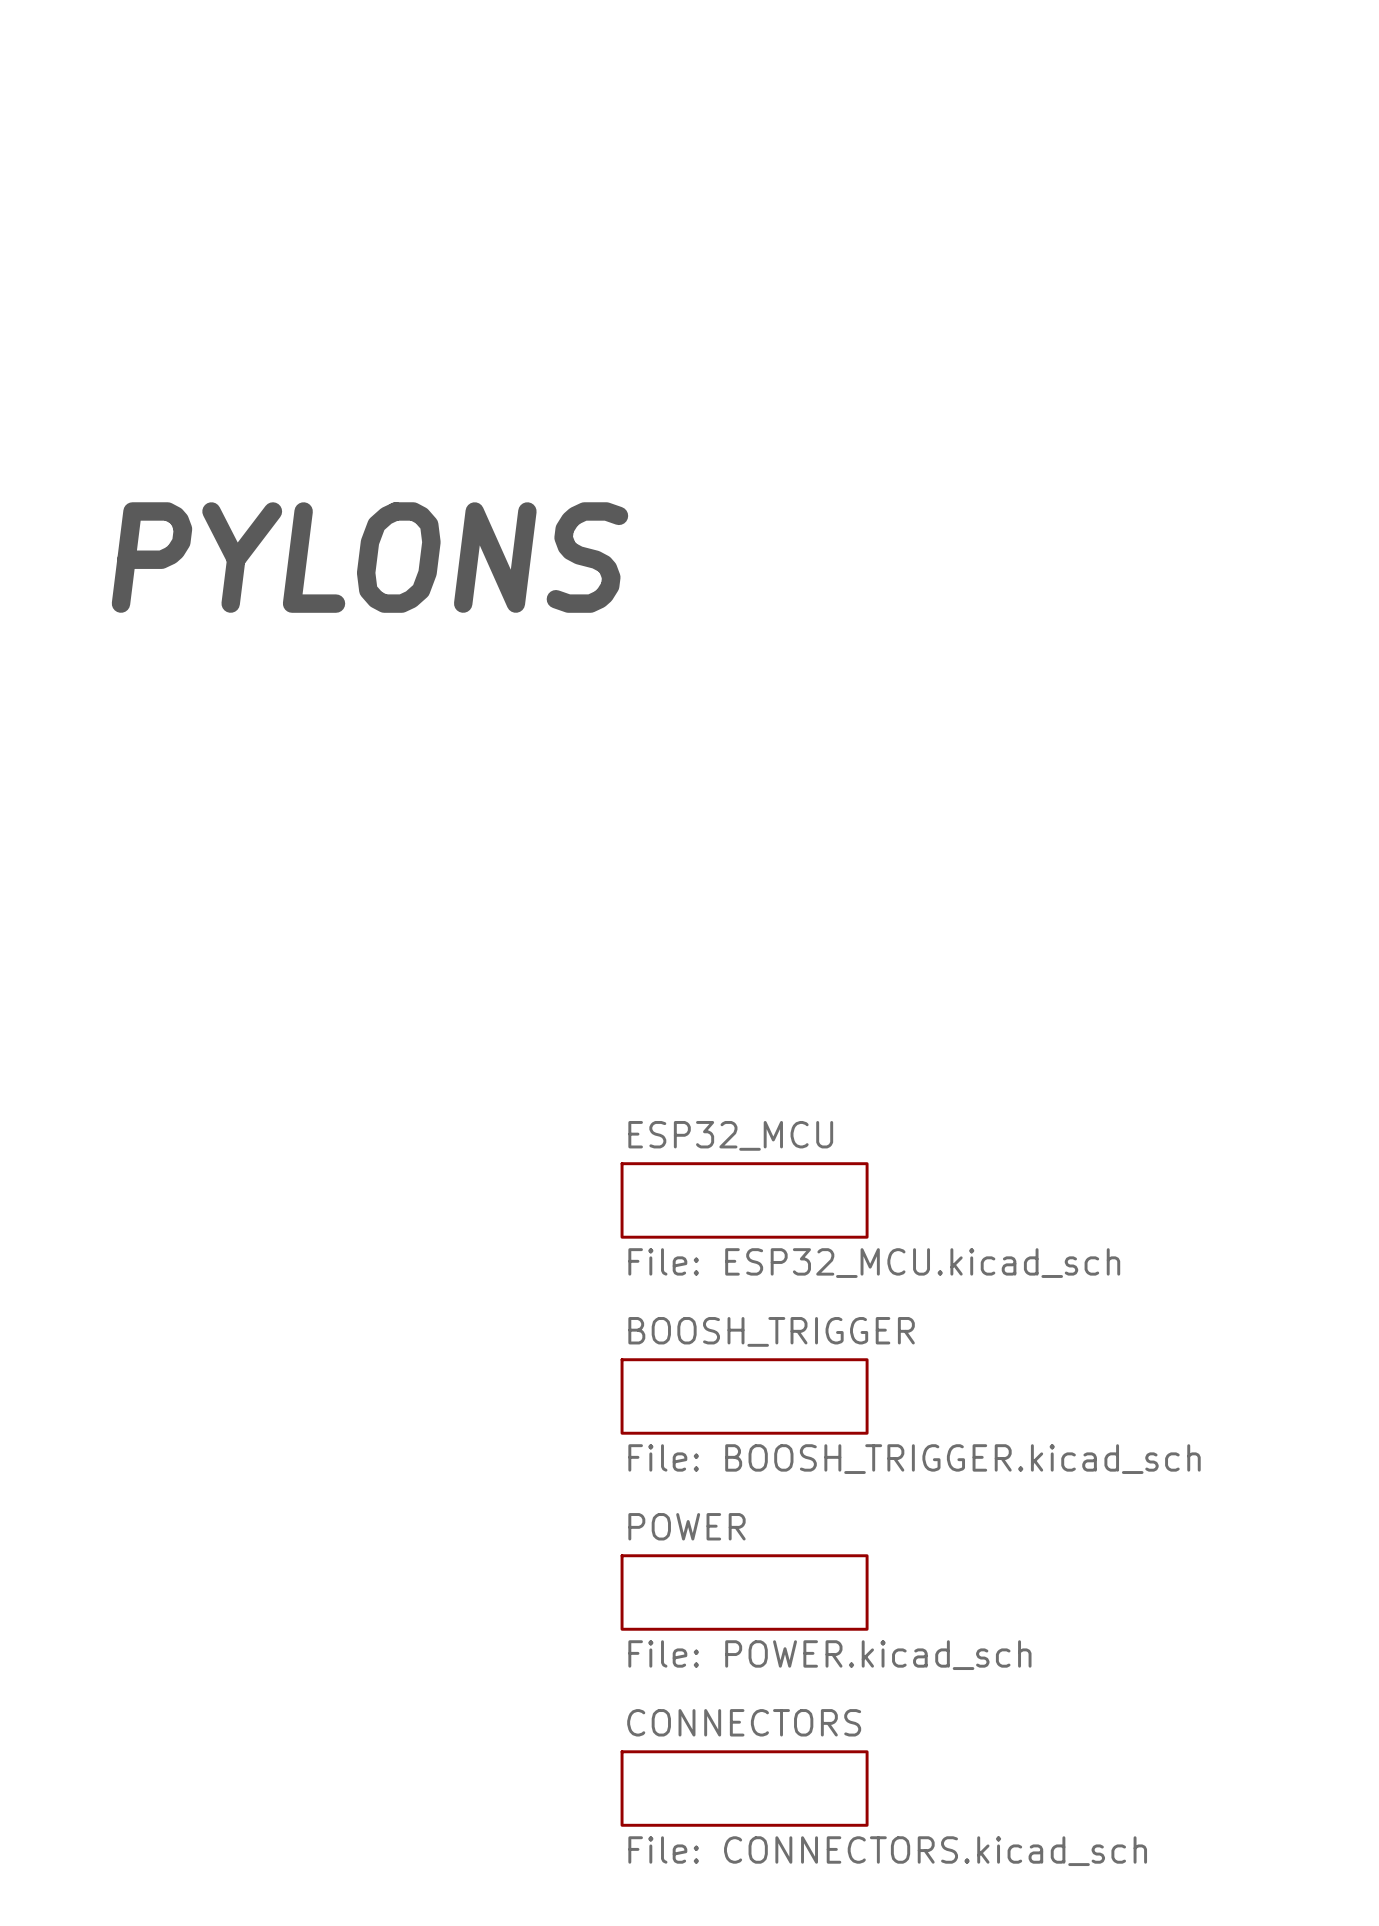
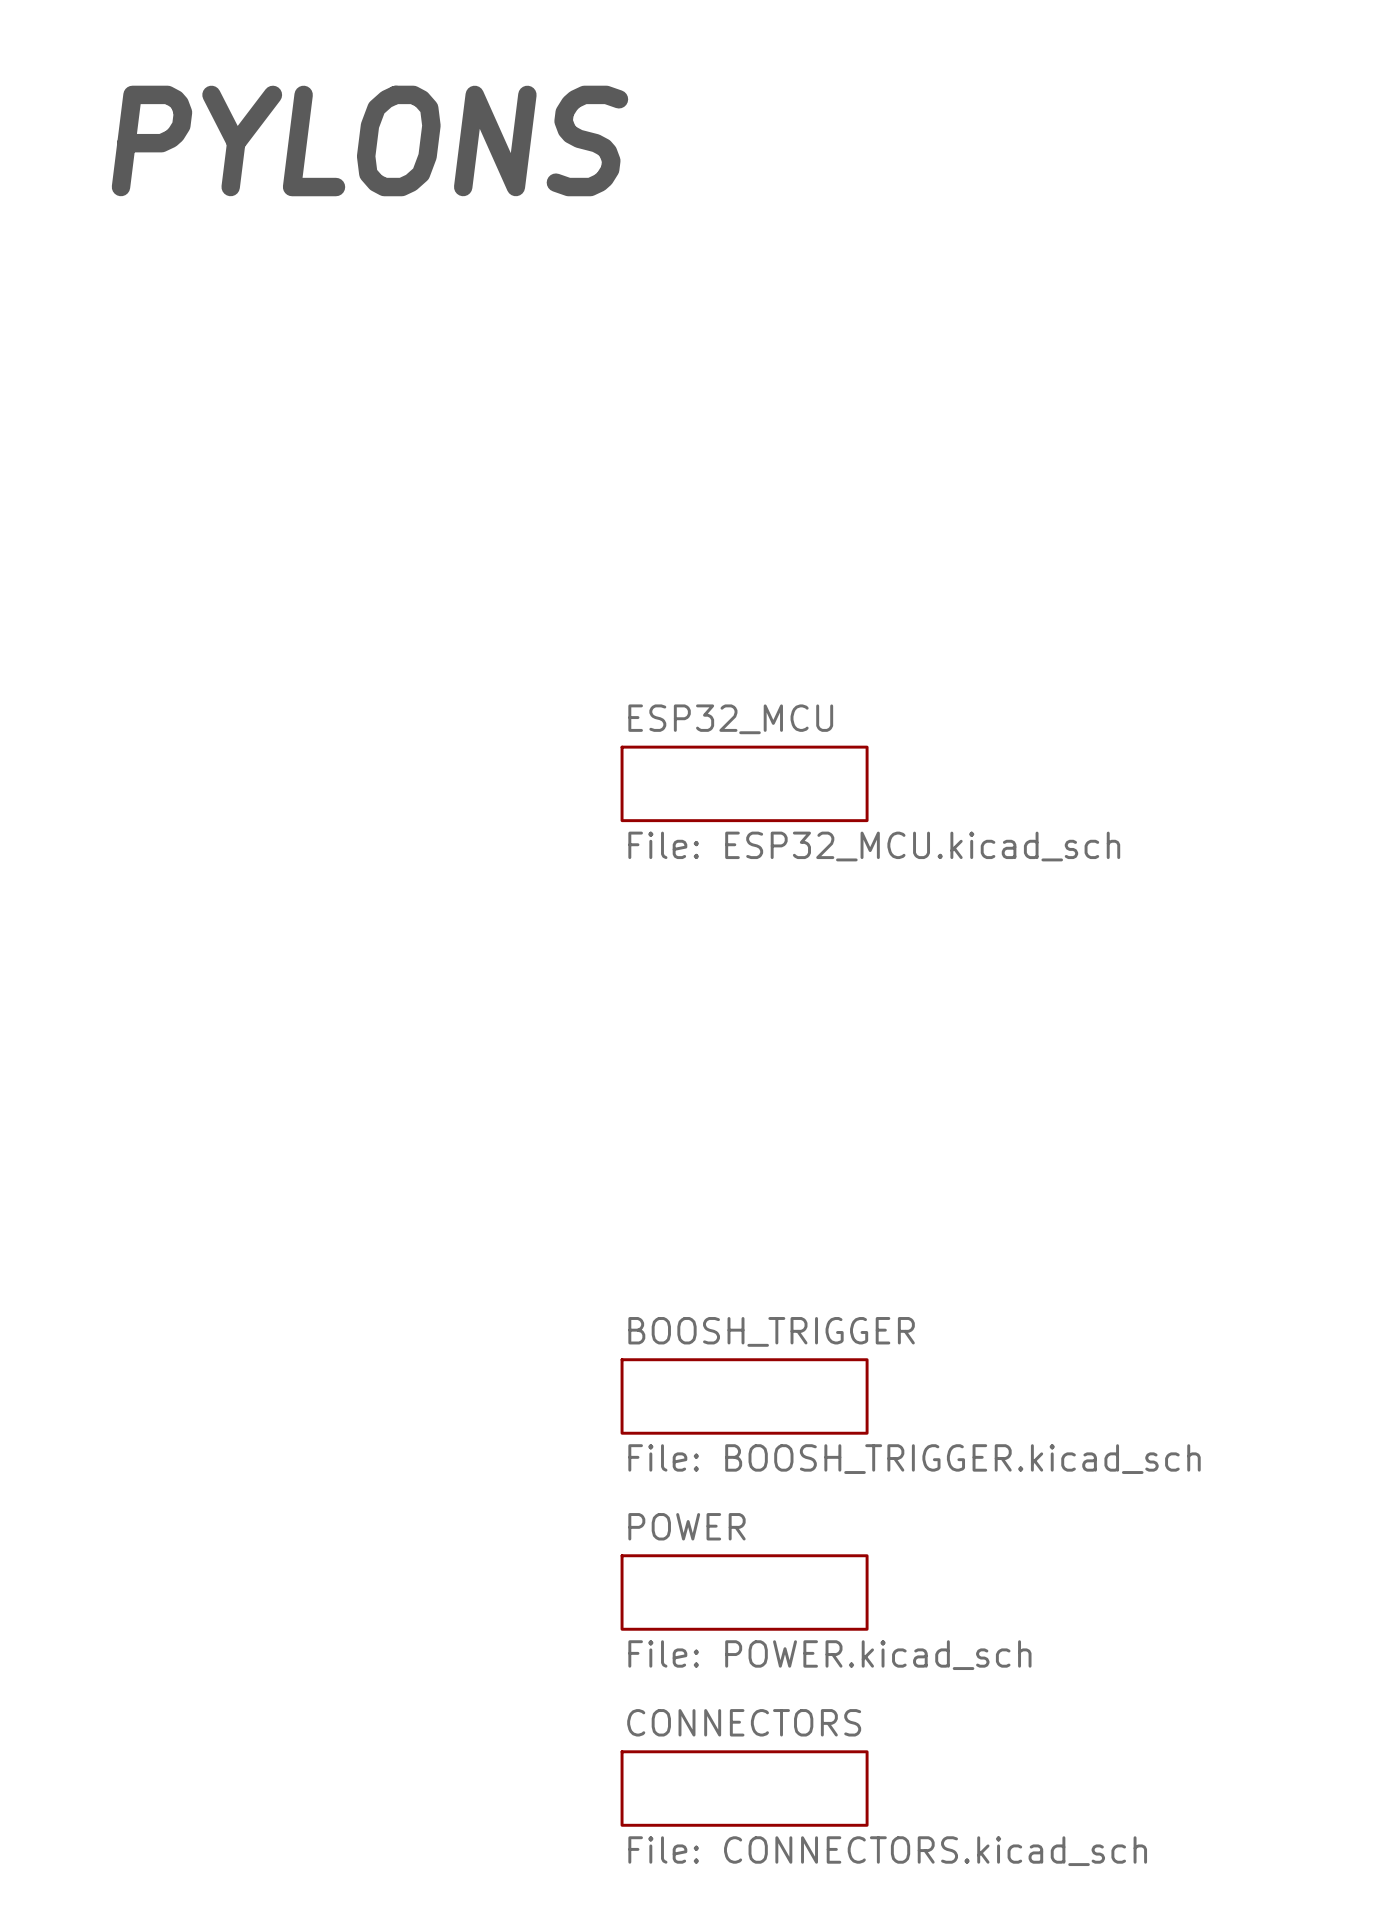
text position: PYLONS (369, 557) -> PYLONS (369, 140)
sheet ESP32_MCU position: (744, 1200) -> (744, 783)

